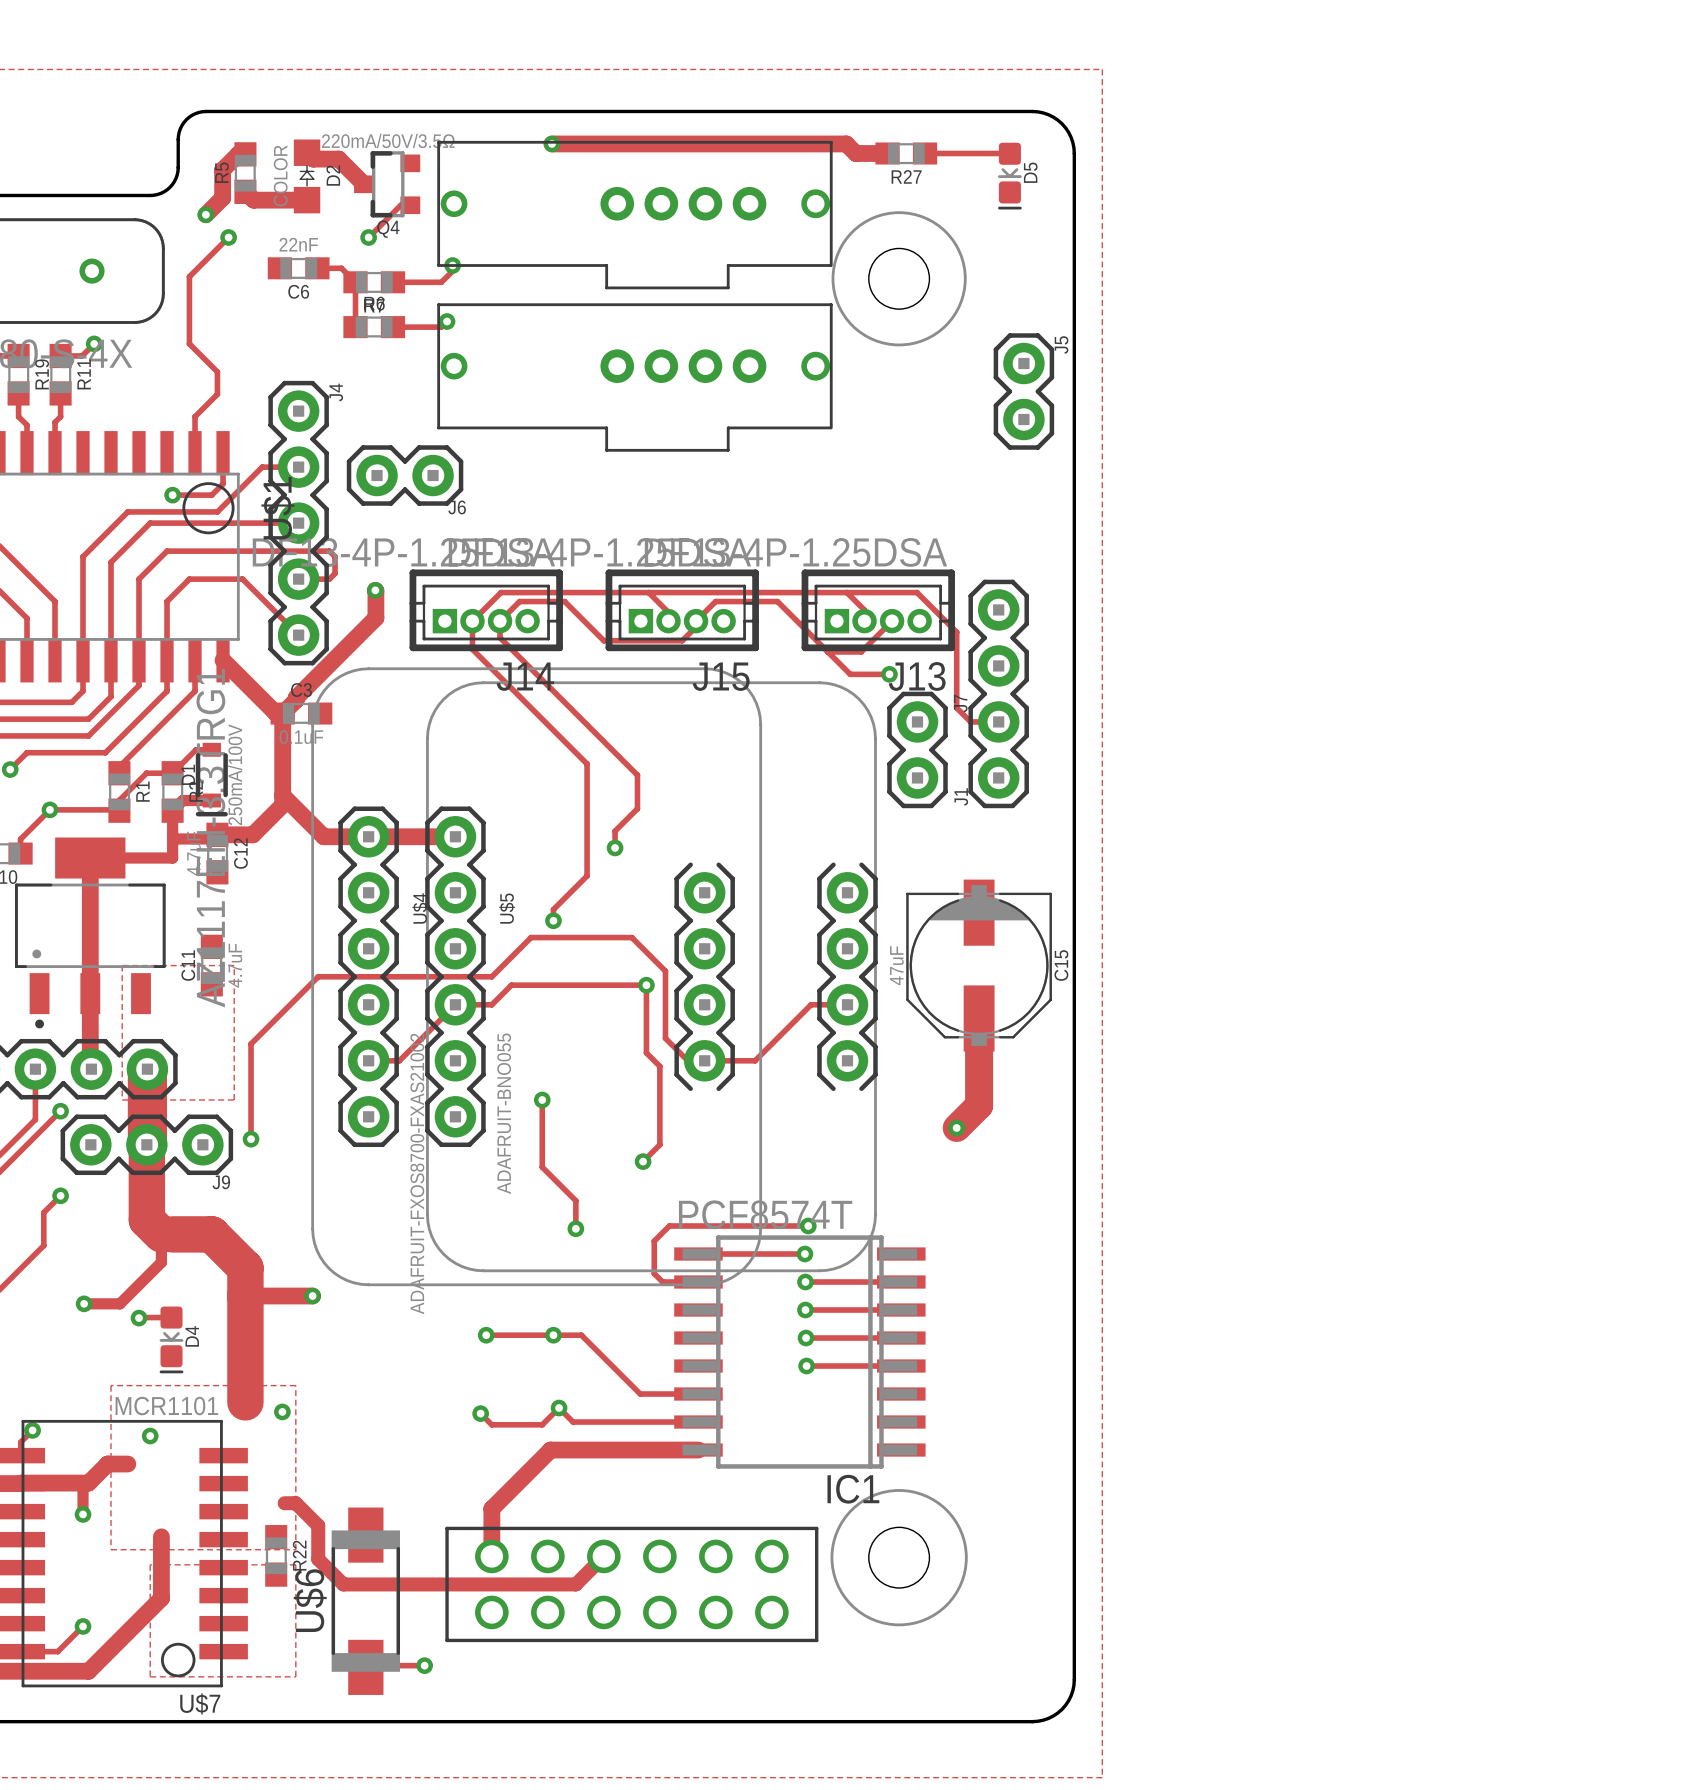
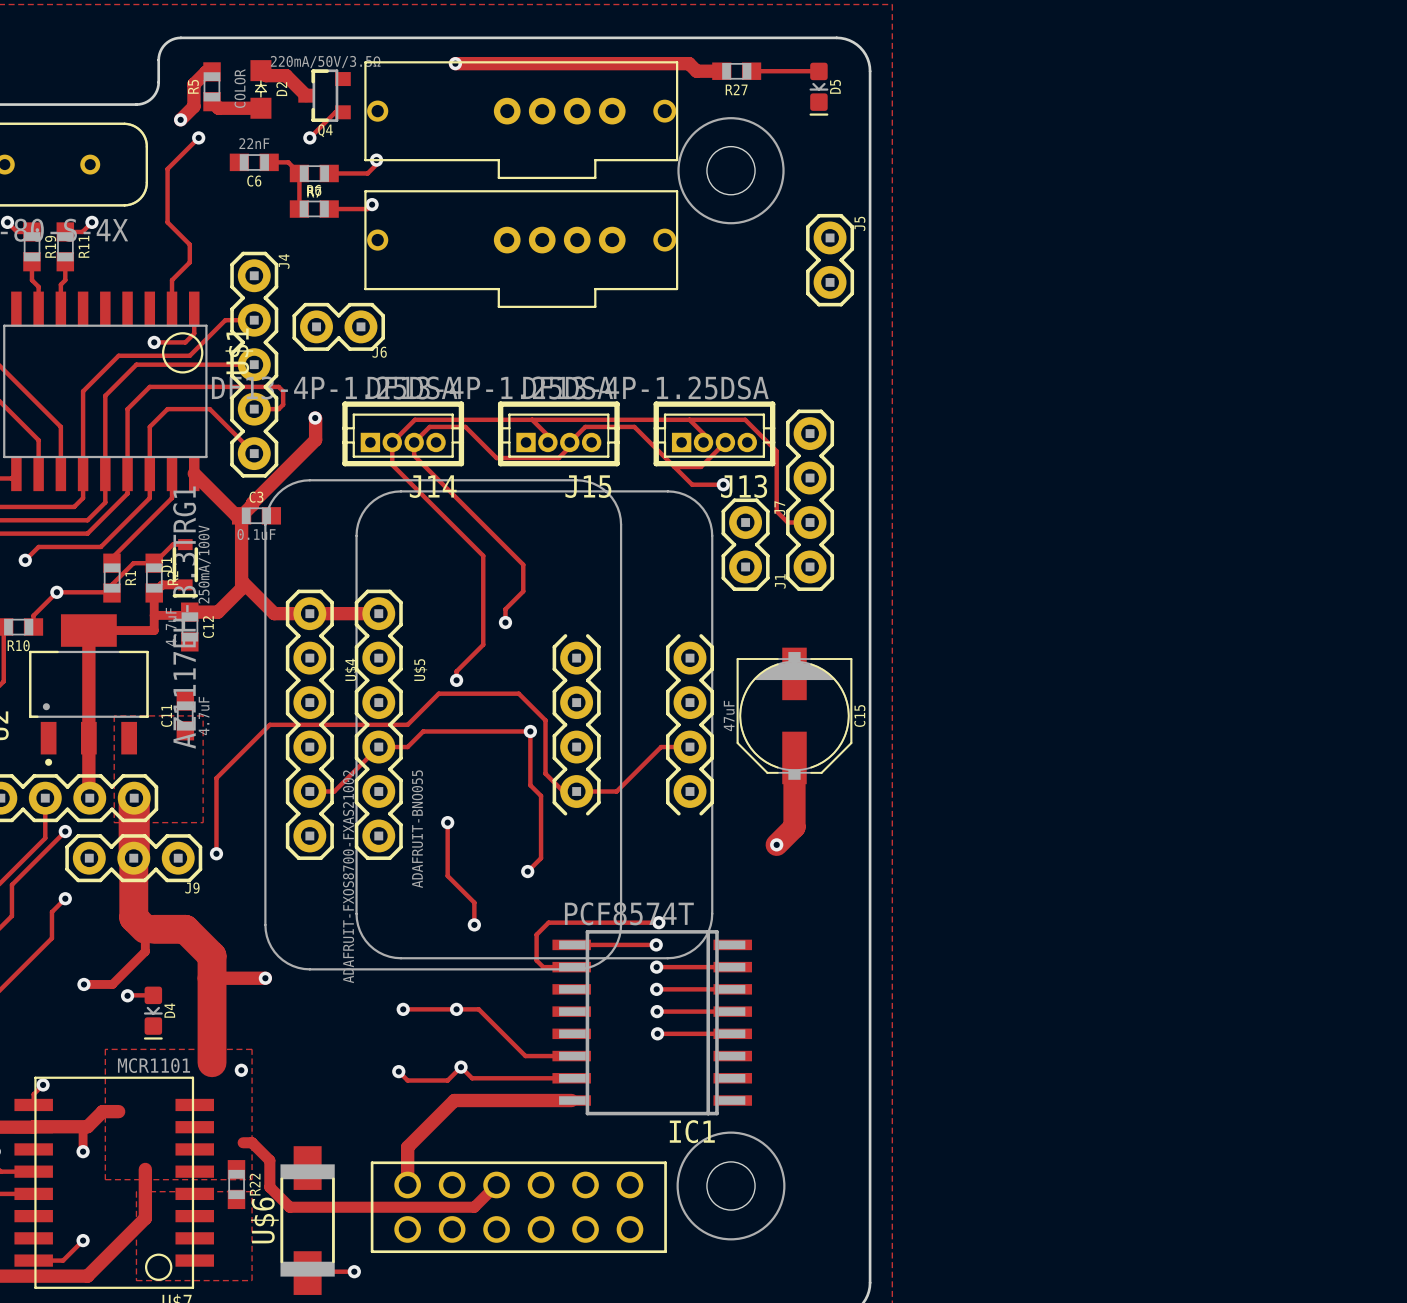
via: (150, 1436) -> none

